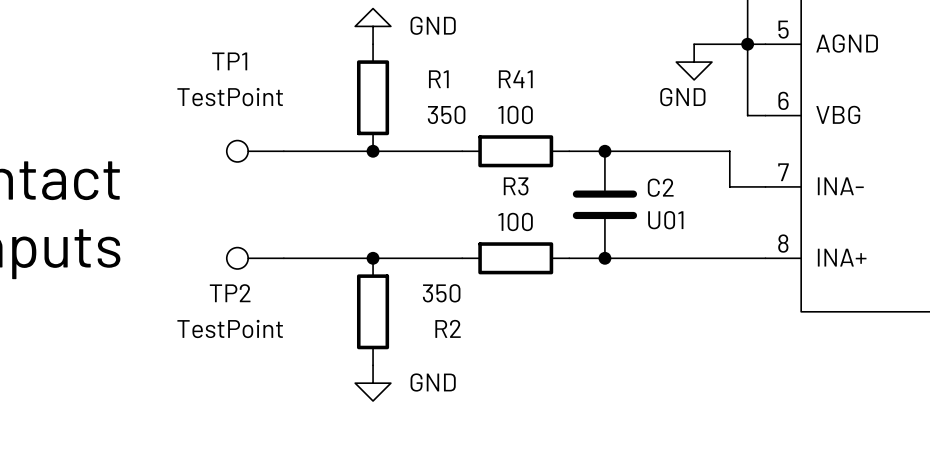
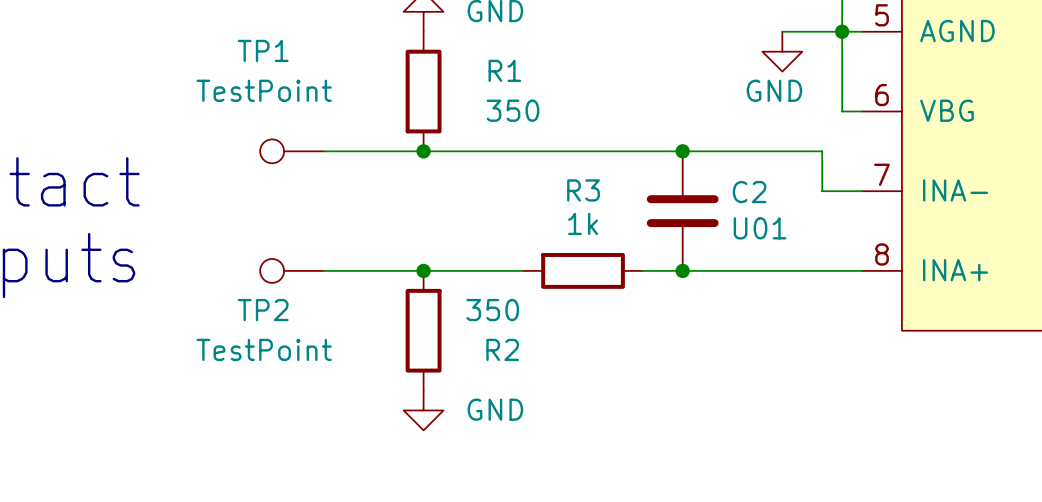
wire: none -> (523, 151) (642, 151)
R41: 100 (515, 151) -> none
R3 value: 100 (515, 221) -> 1k (583, 223)

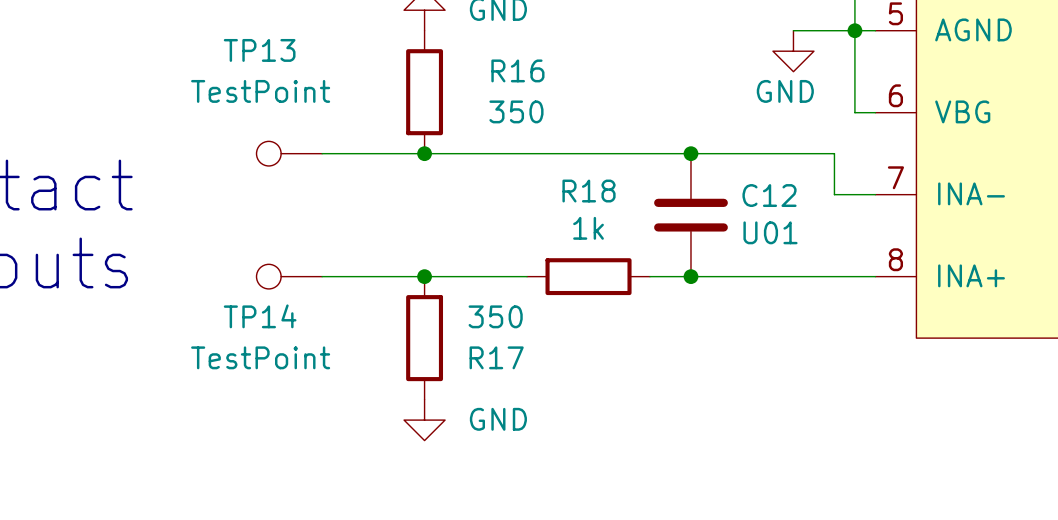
TP1 name: TP1 (263, 50) -> TP13 (259, 50)
R1 name: R1 (504, 70) -> R16 (517, 70)
R3 name: R3 (583, 190) -> R18 (589, 191)
C2 name: C2 (749, 192) -> C12 (769, 195)
TP2 name: TP2 (263, 310) -> TP14 (260, 316)
R2 name: R2 (502, 349) -> R17 (496, 357)

